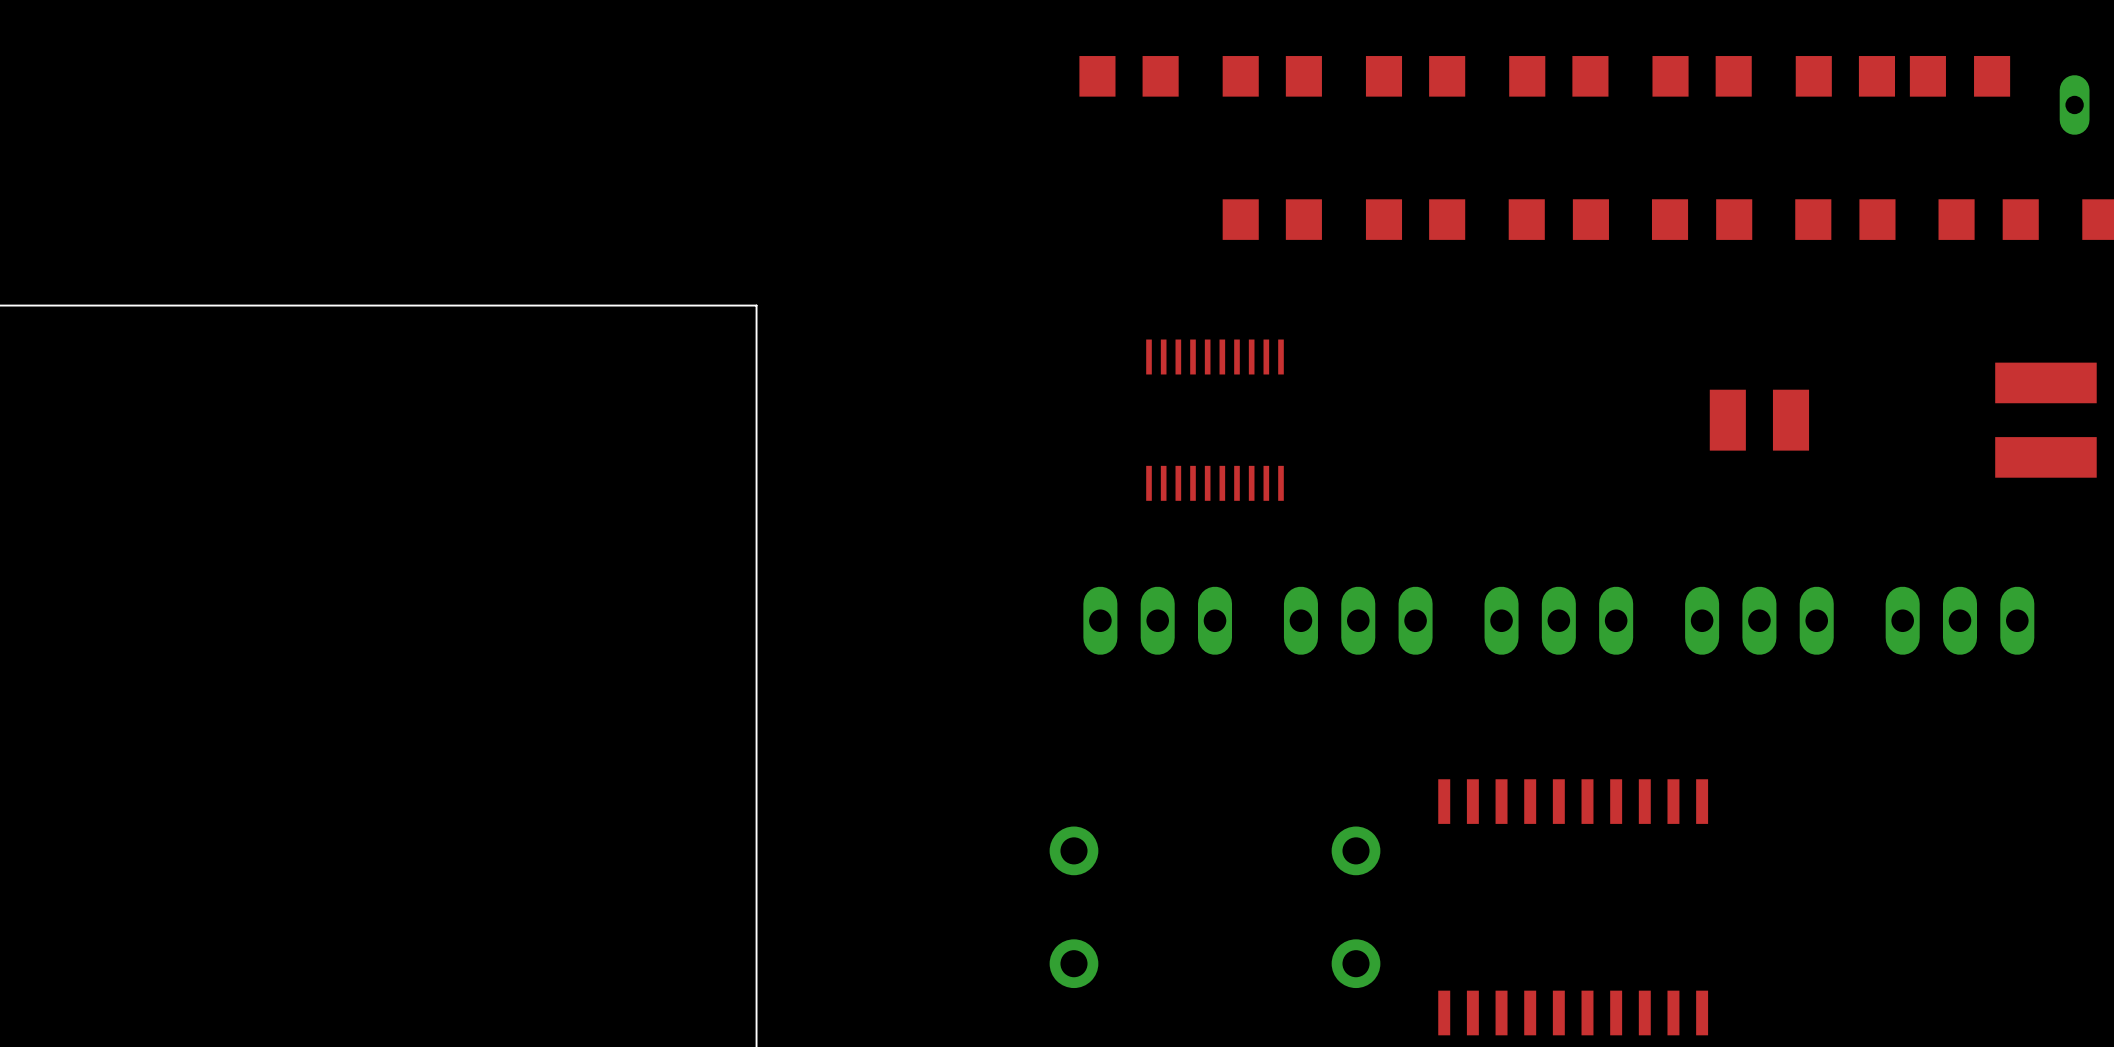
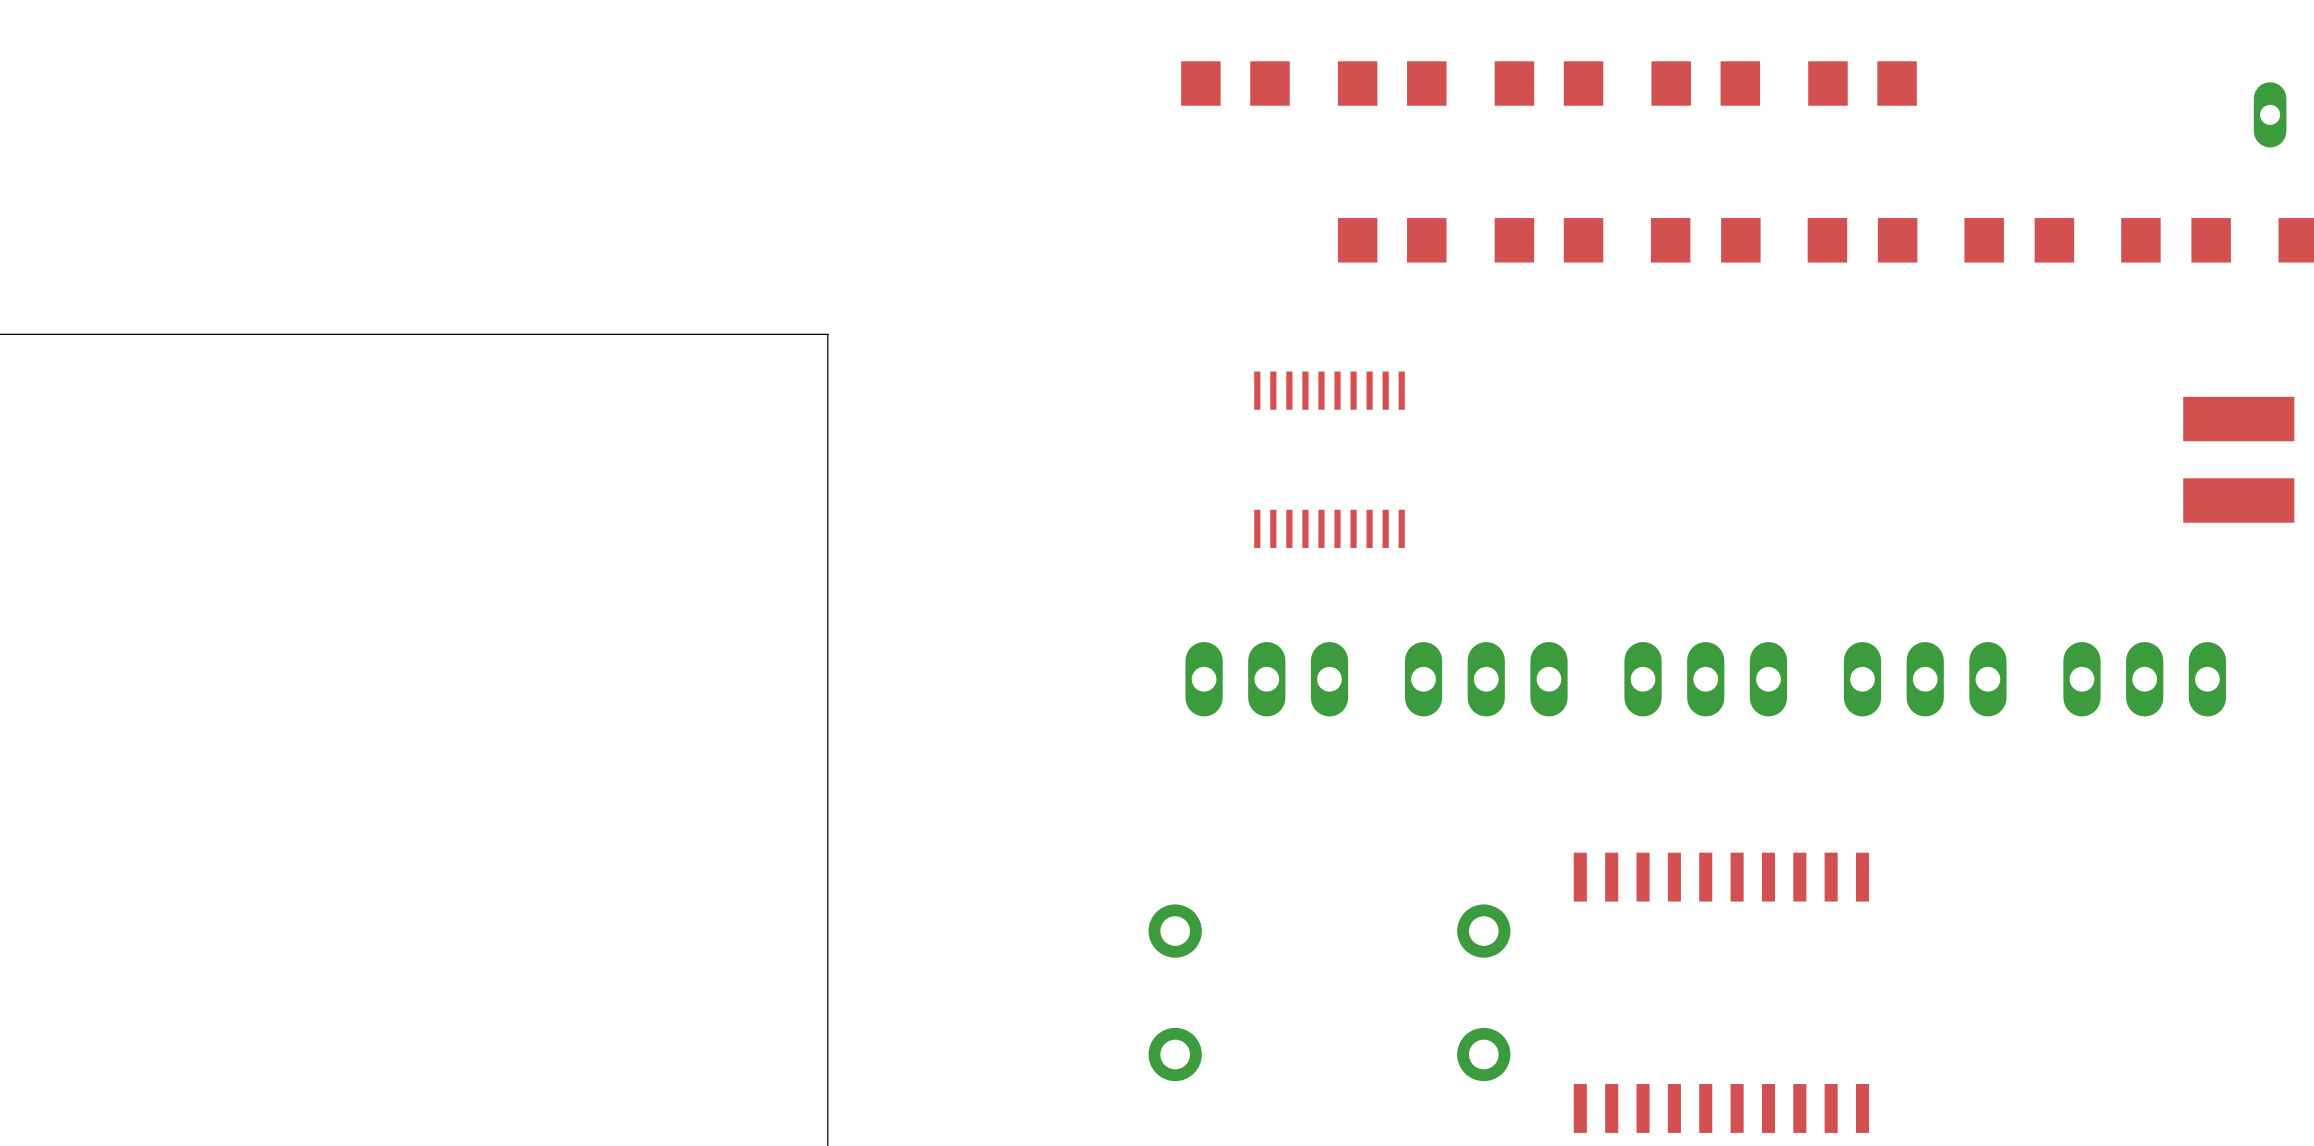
part: (1845, 76) -> none
part: (1959, 76) -> none
part: (1759, 420) -> none

